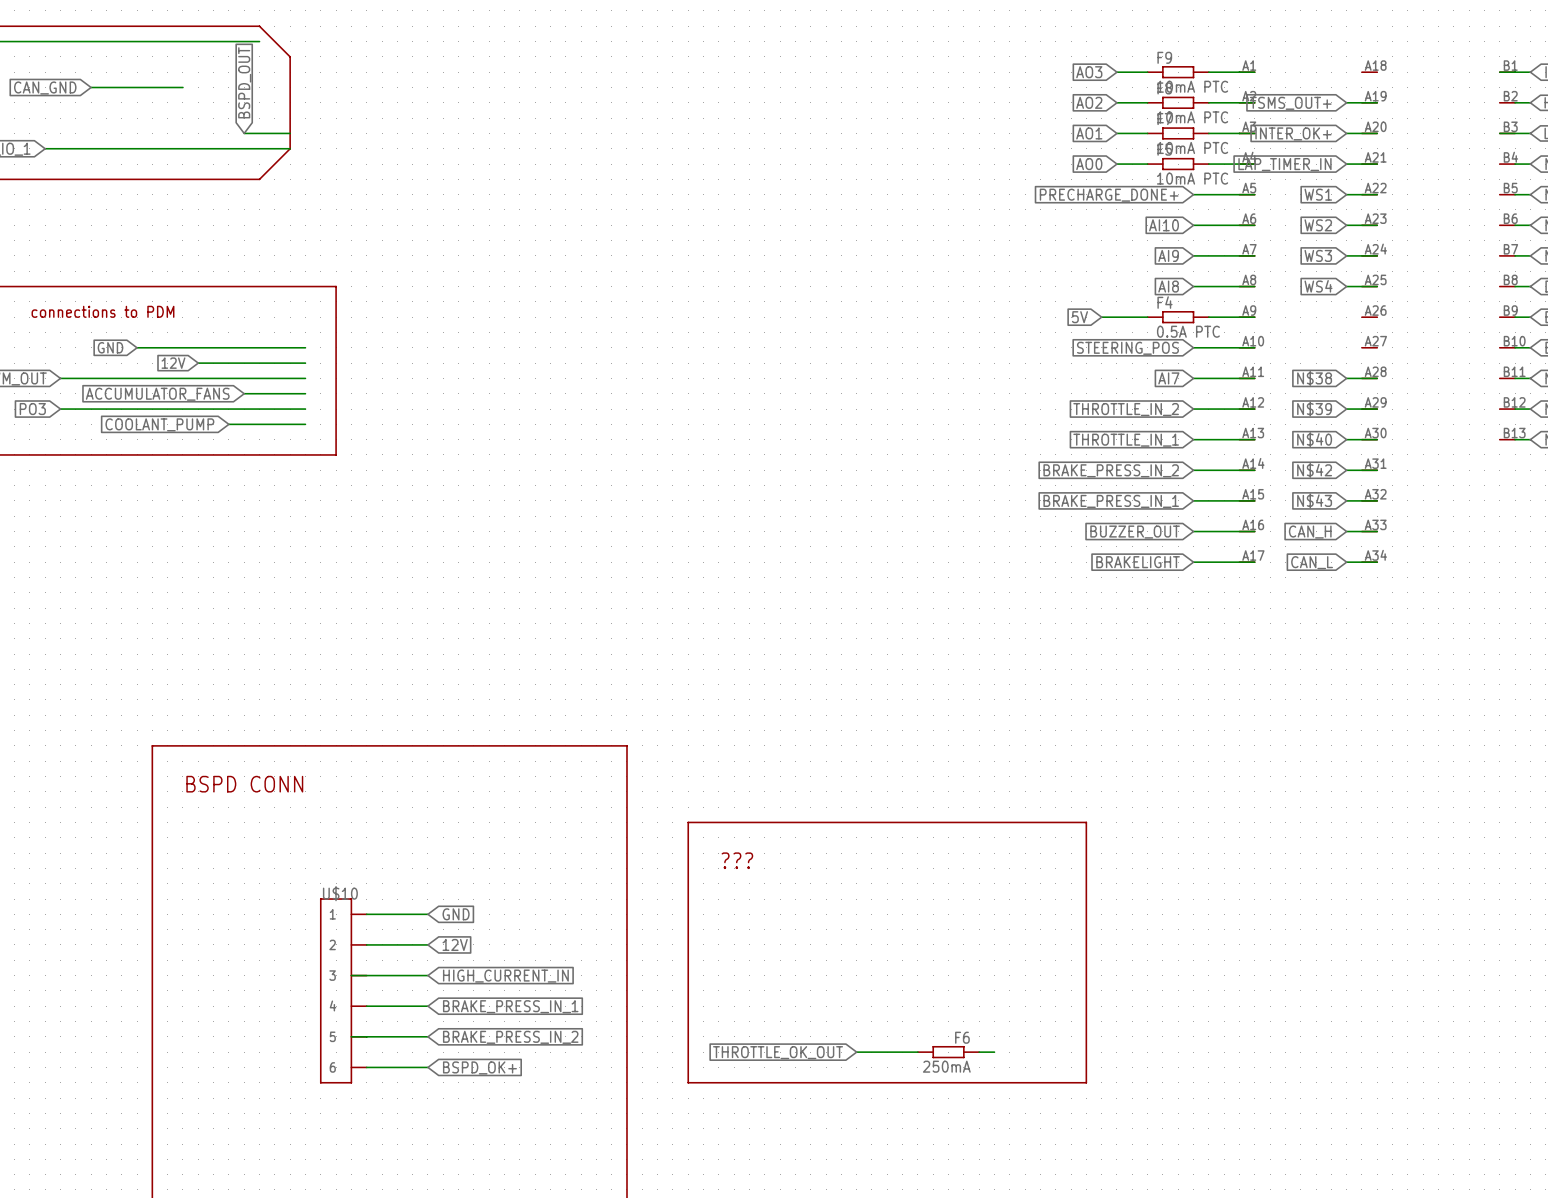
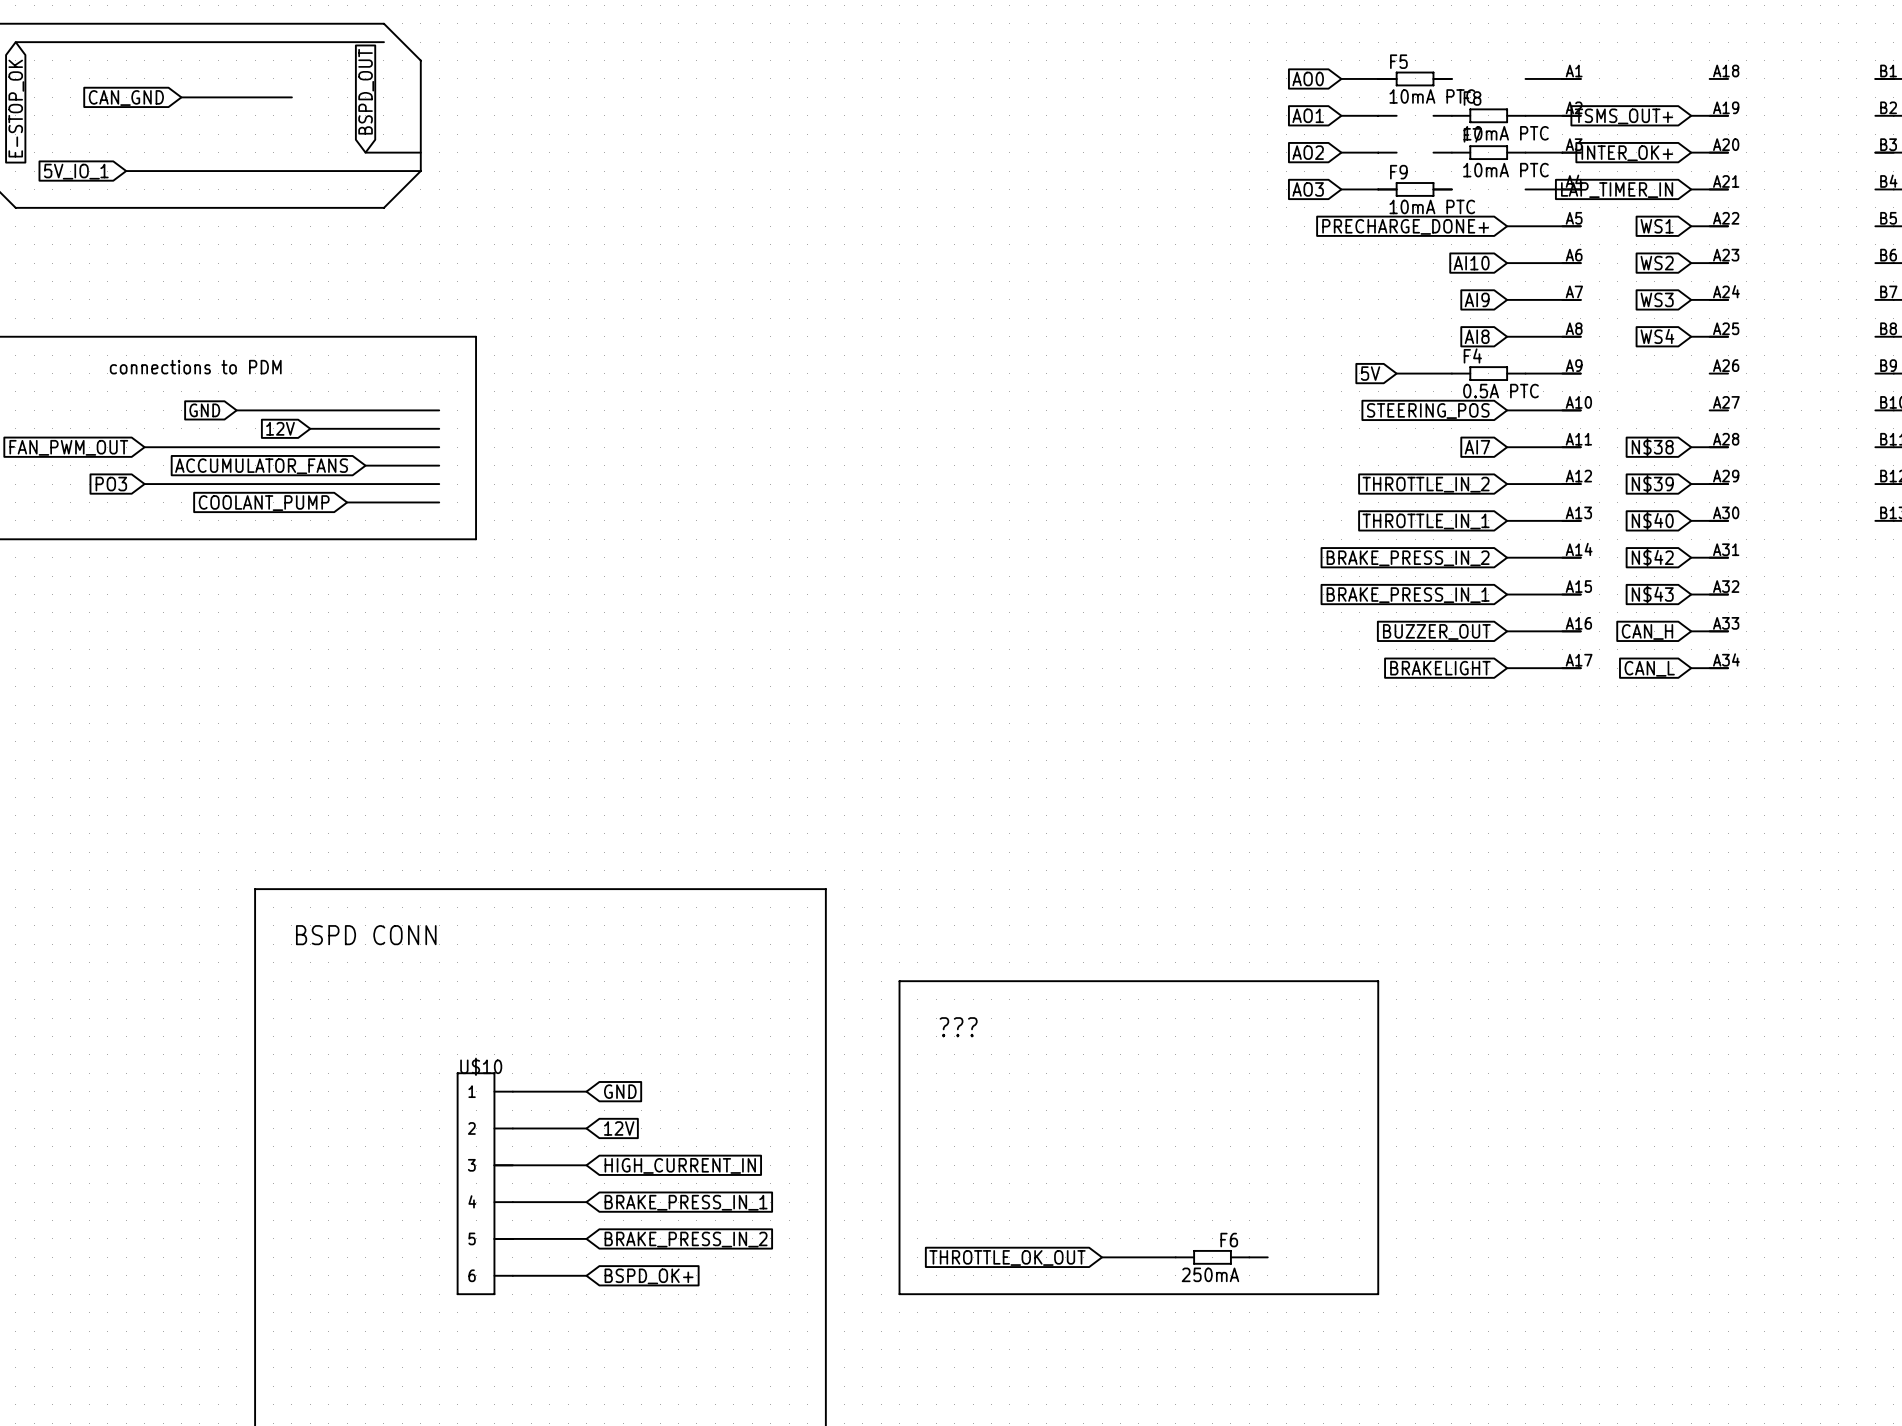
wire: none -> (1341, 78) (1396, 78)
global label position: AO3 (1089, 72) -> AO3 (1308, 189)
wire: (1116, 72) (1132, 72) -> none
F9 position: (1178, 72) -> (1415, 189)
wire: none -> (1341, 115) (1396, 115)
global label position: AO2 (1089, 102) -> AO2 (1308, 152)
wire: (1116, 102) (1132, 102) -> none
wire: none -> (1341, 152) (1396, 152)
global label position: AO1 (1089, 133) -> AO1 (1308, 115)
wire: (1116, 133) (1132, 133) -> none
wire: none -> (1341, 189) (1396, 189)
global label position: AO0 (1089, 164) -> AO0 (1308, 78)
wire: (1116, 164) (1132, 164) -> none
F5 position: (1178, 164) -> (1415, 78)

